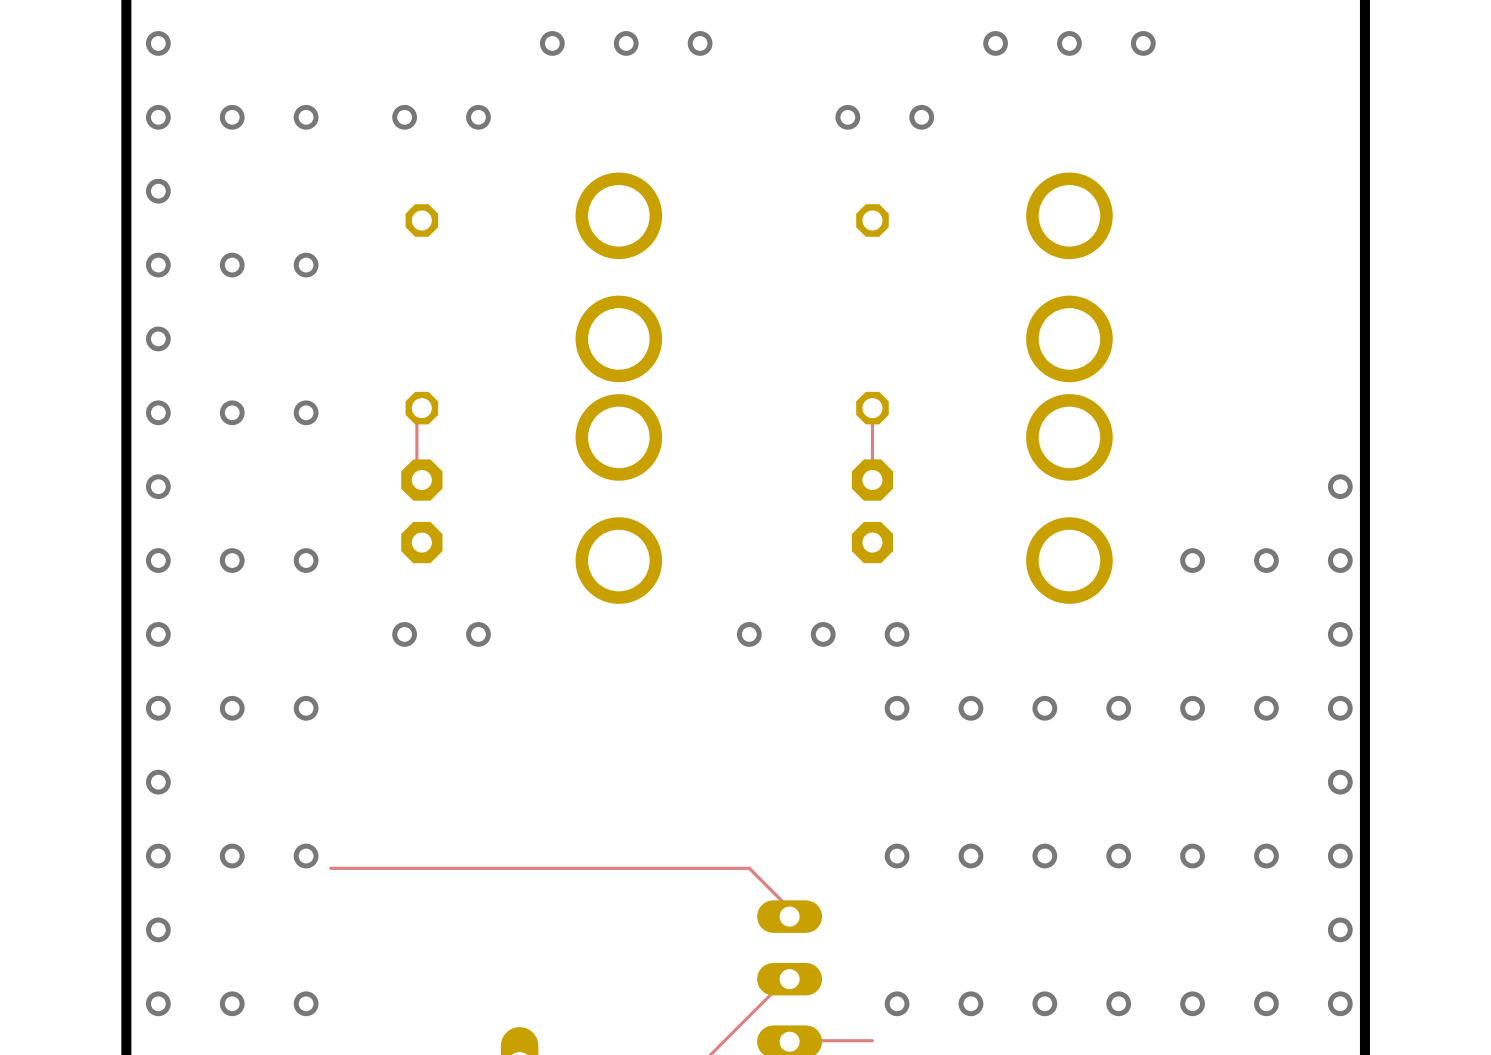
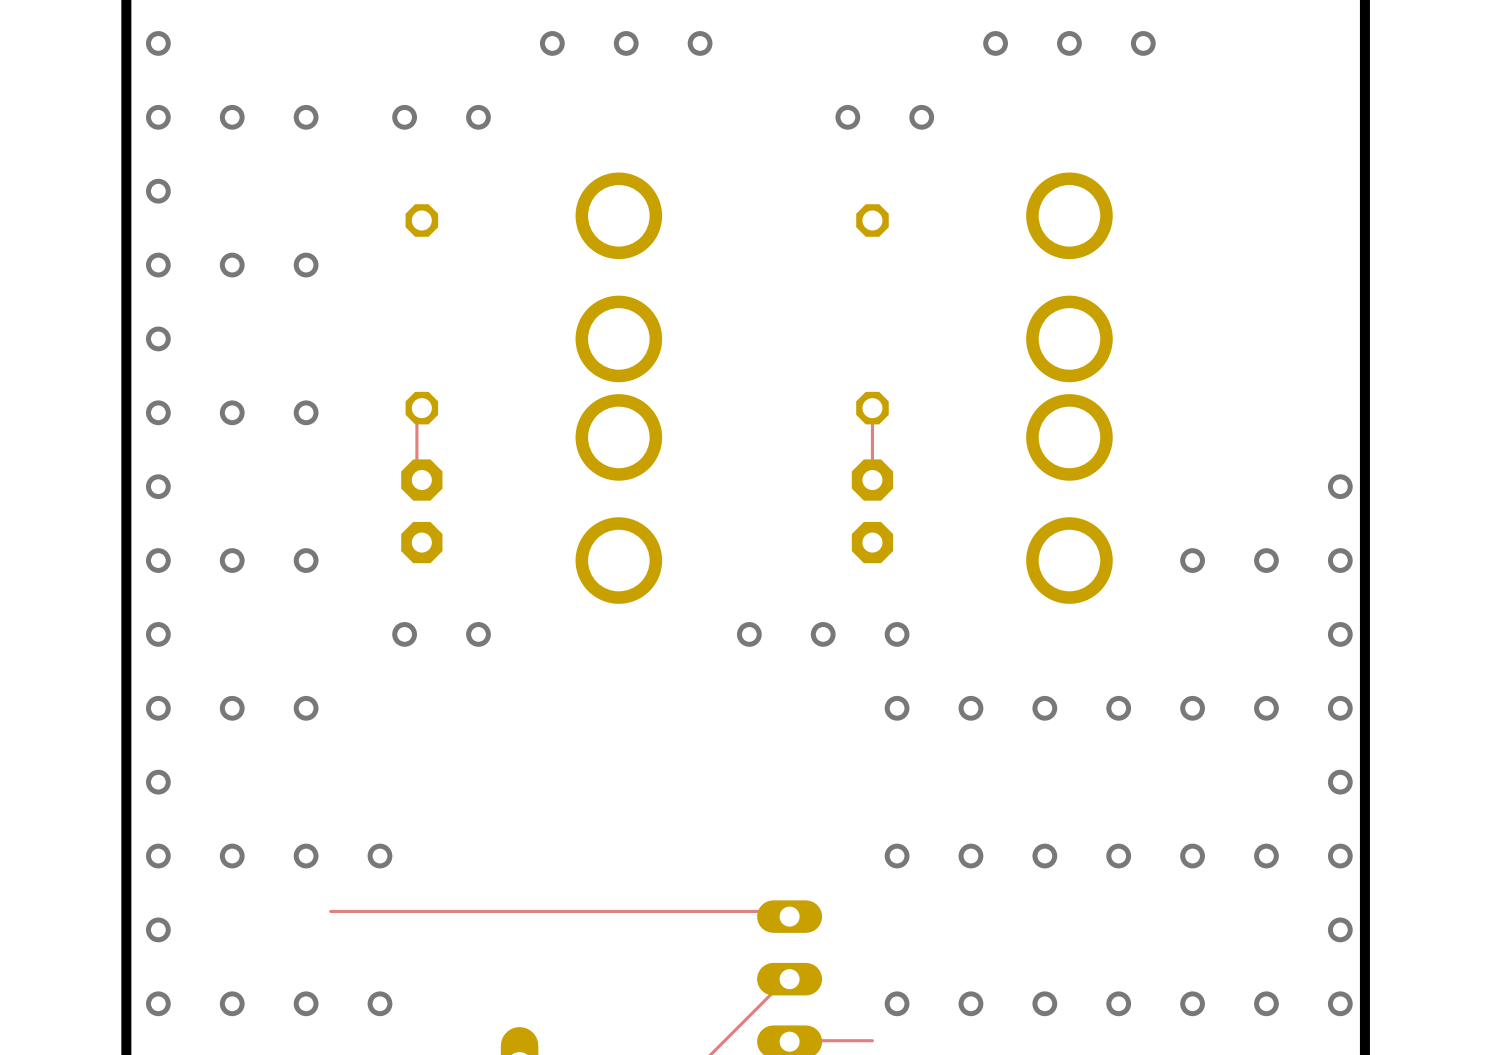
via: none -> (379, 856)
top track: (330, 868) (749, 868) (786, 905) (789, 916) -> (330, 911) (786, 911) (789, 916)
via: none -> (379, 1003)

